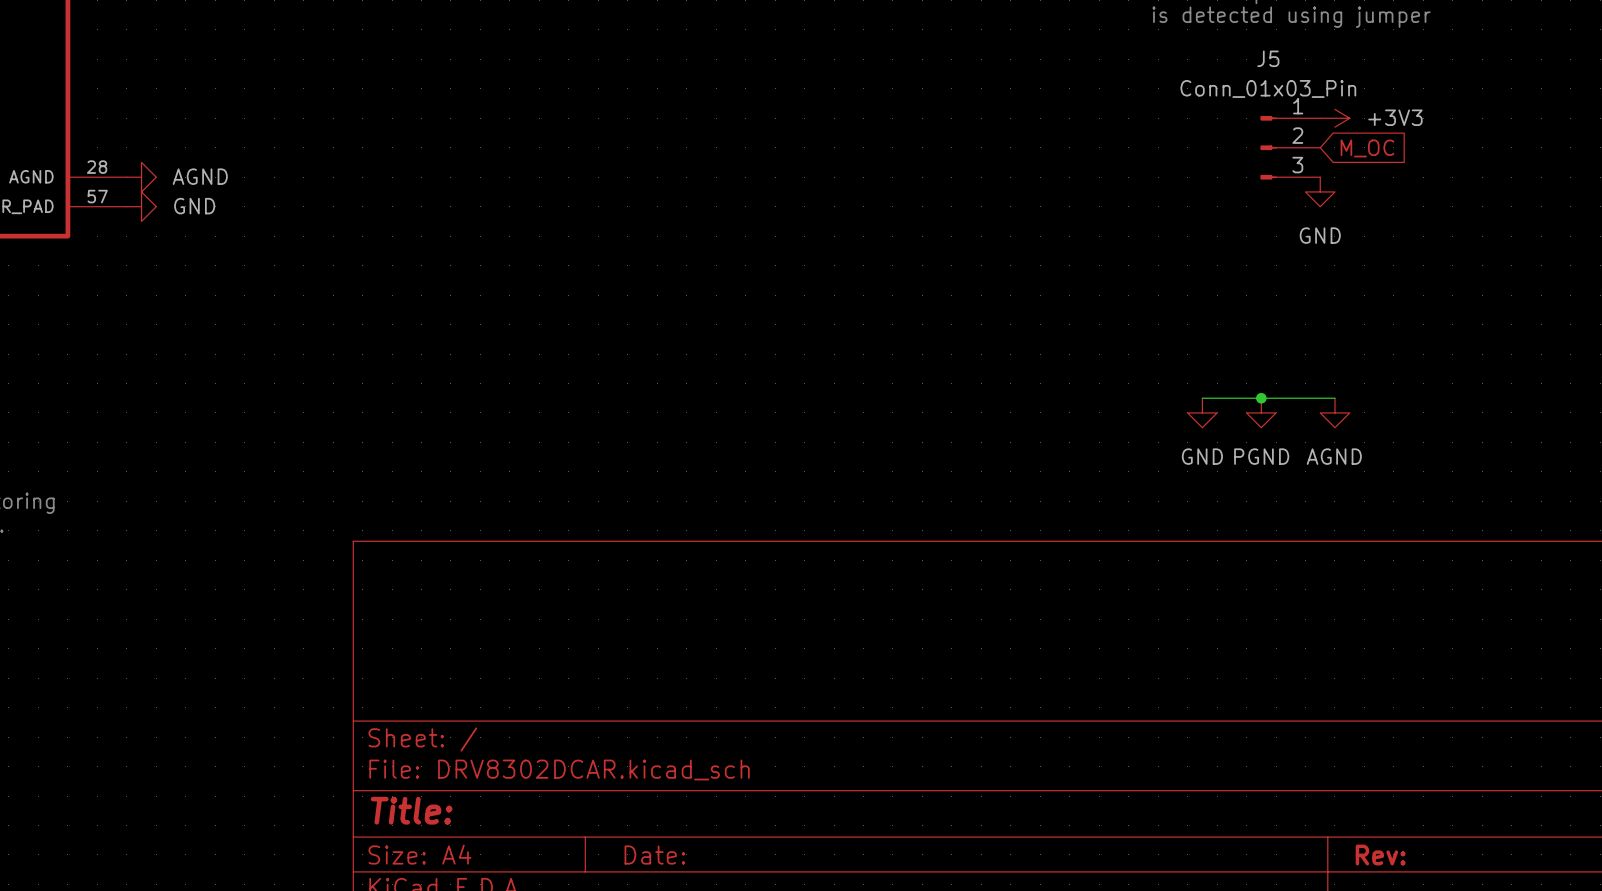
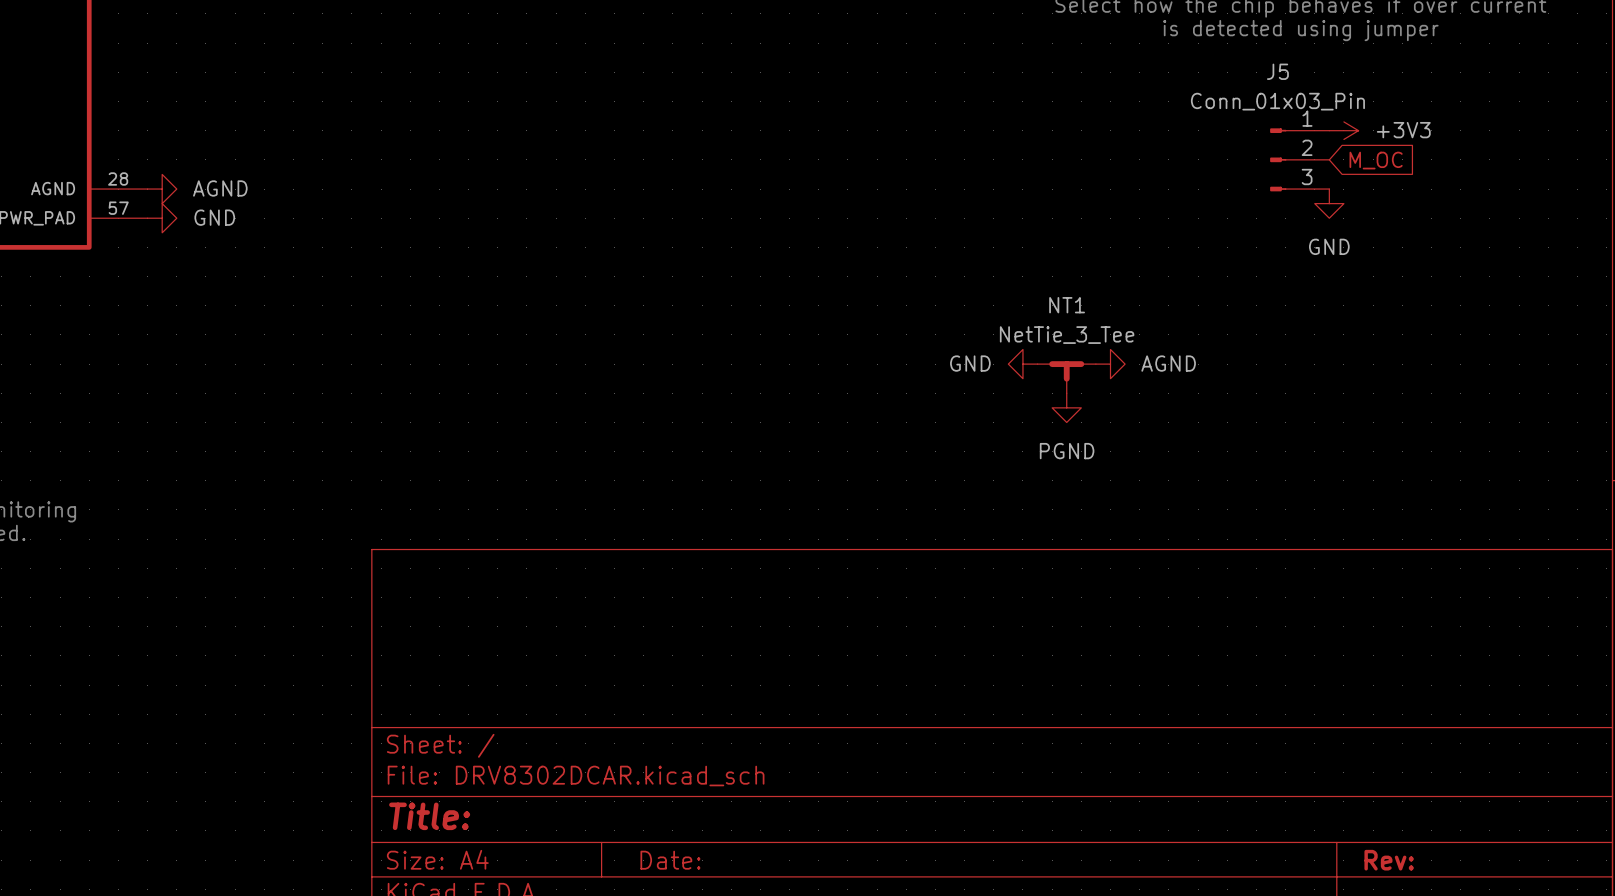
NT1: none -> NetTie_3_Tee (1066, 377)
wire: (1202, 398) (1334, 398) -> none
junction: (1261, 398) -> none
power symbol rotation: 0° (1202, 412) -> 90° clockwise (1022, 364)
power symbol position: GND (1202, 412) -> GND (1022, 364)
power symbol position: PGND (1261, 412) -> PGND (1066, 407)
power symbol rotation: 0° (1334, 412) -> 90° counterclockwise (1110, 364)
power symbol position: AGND (1334, 412) -> AGND (1110, 364)

